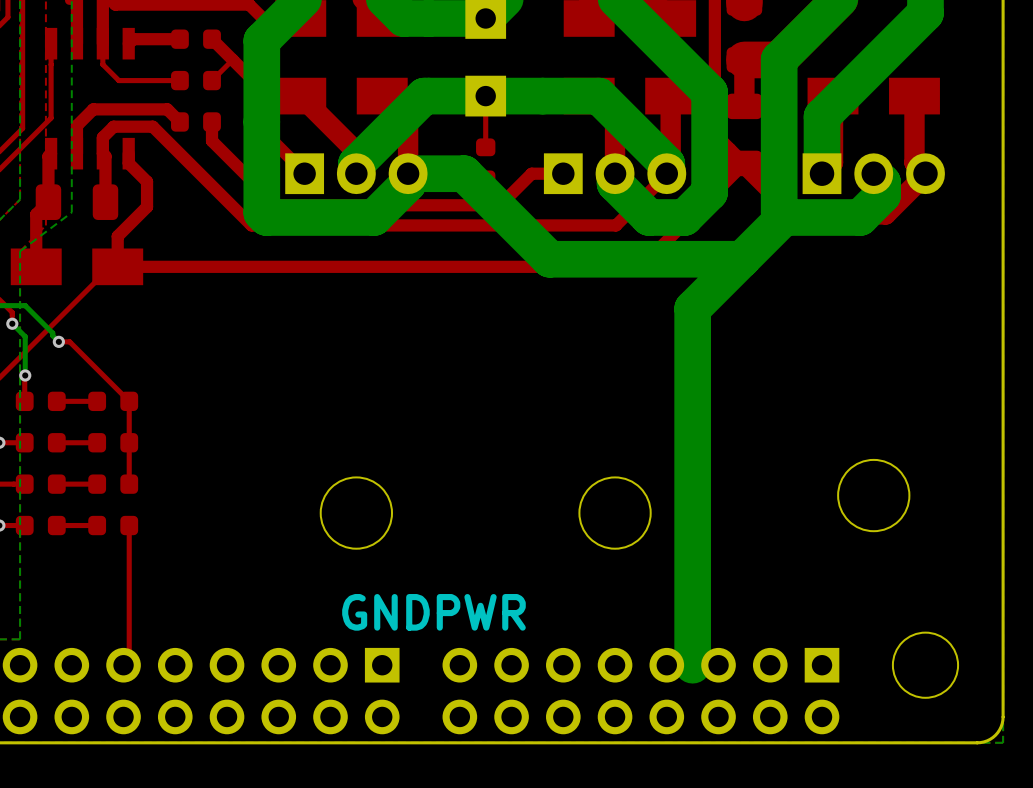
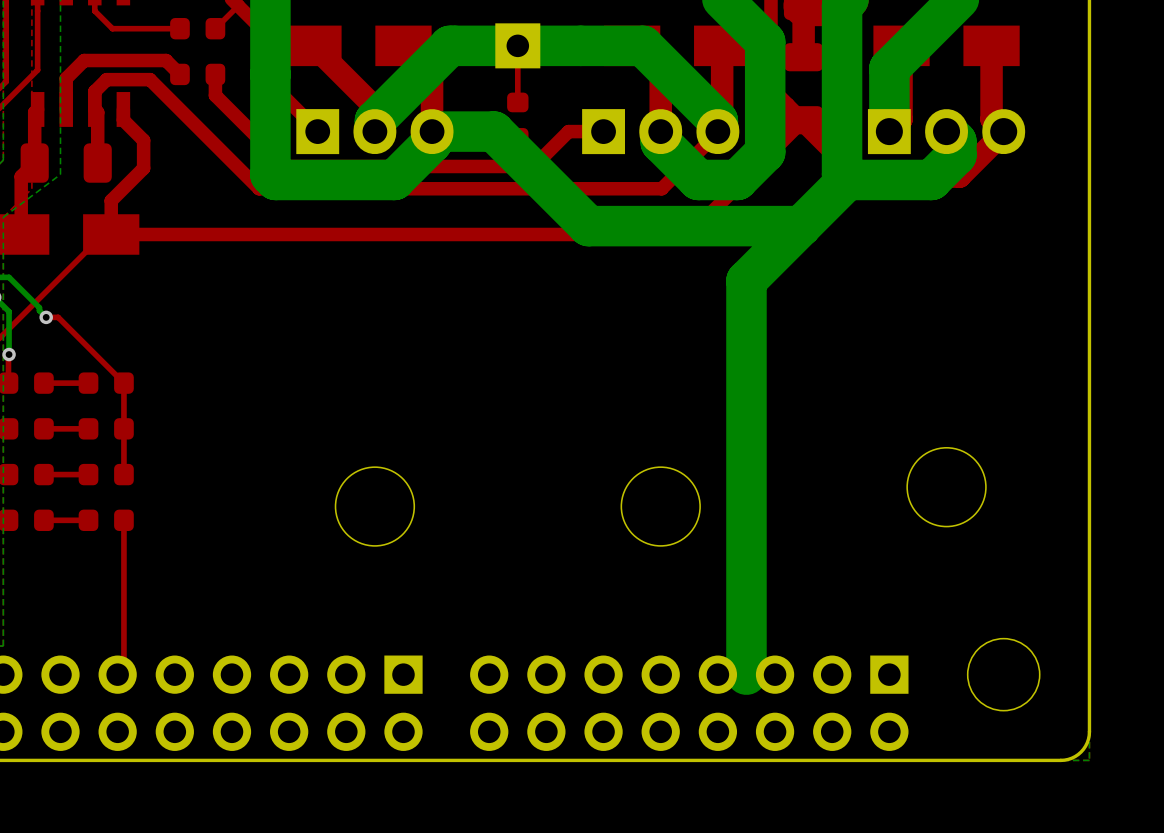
text: GNDPWR (433, 612) -> none

